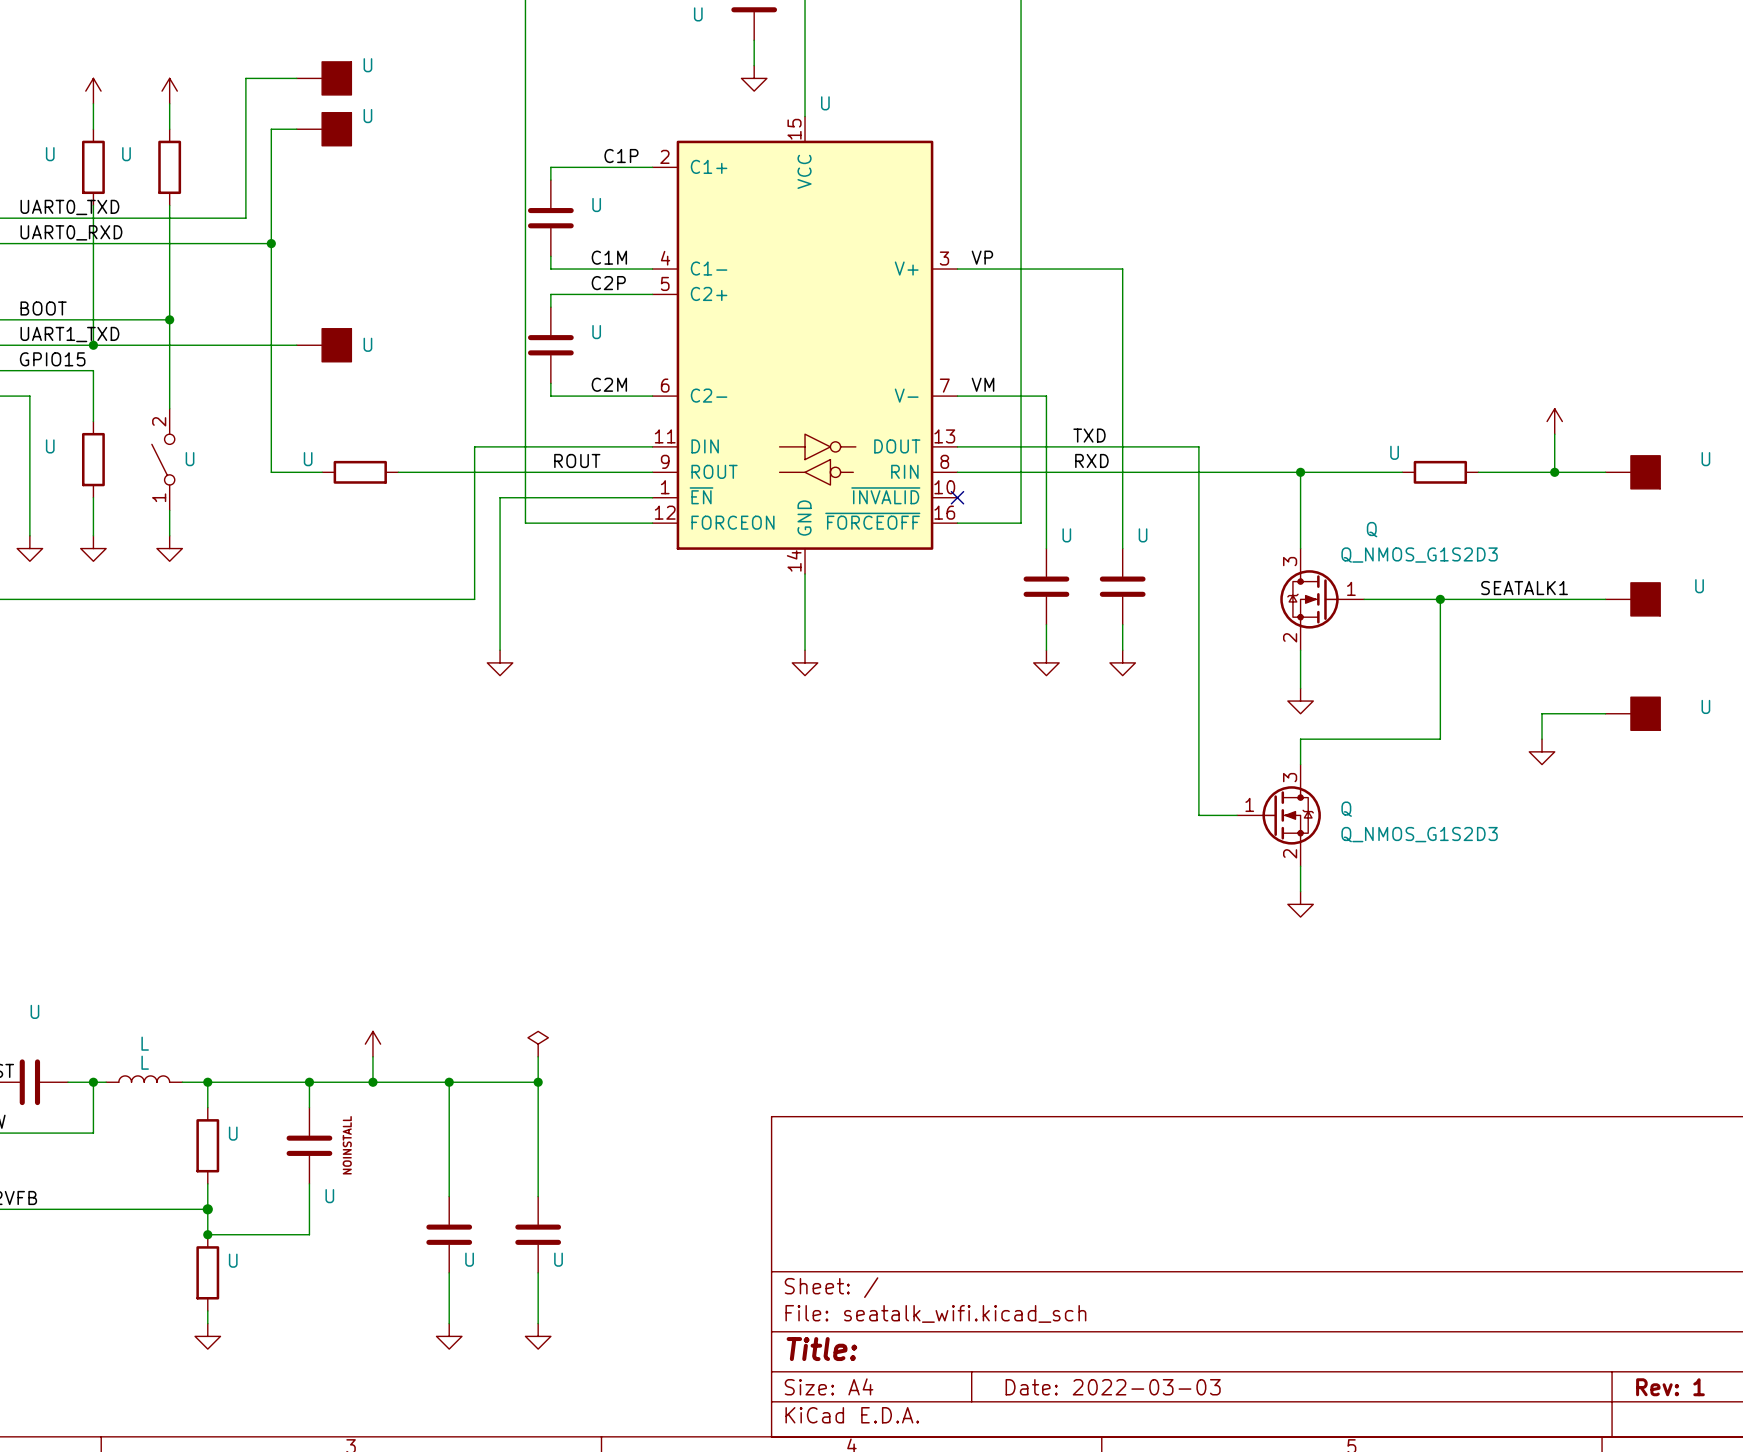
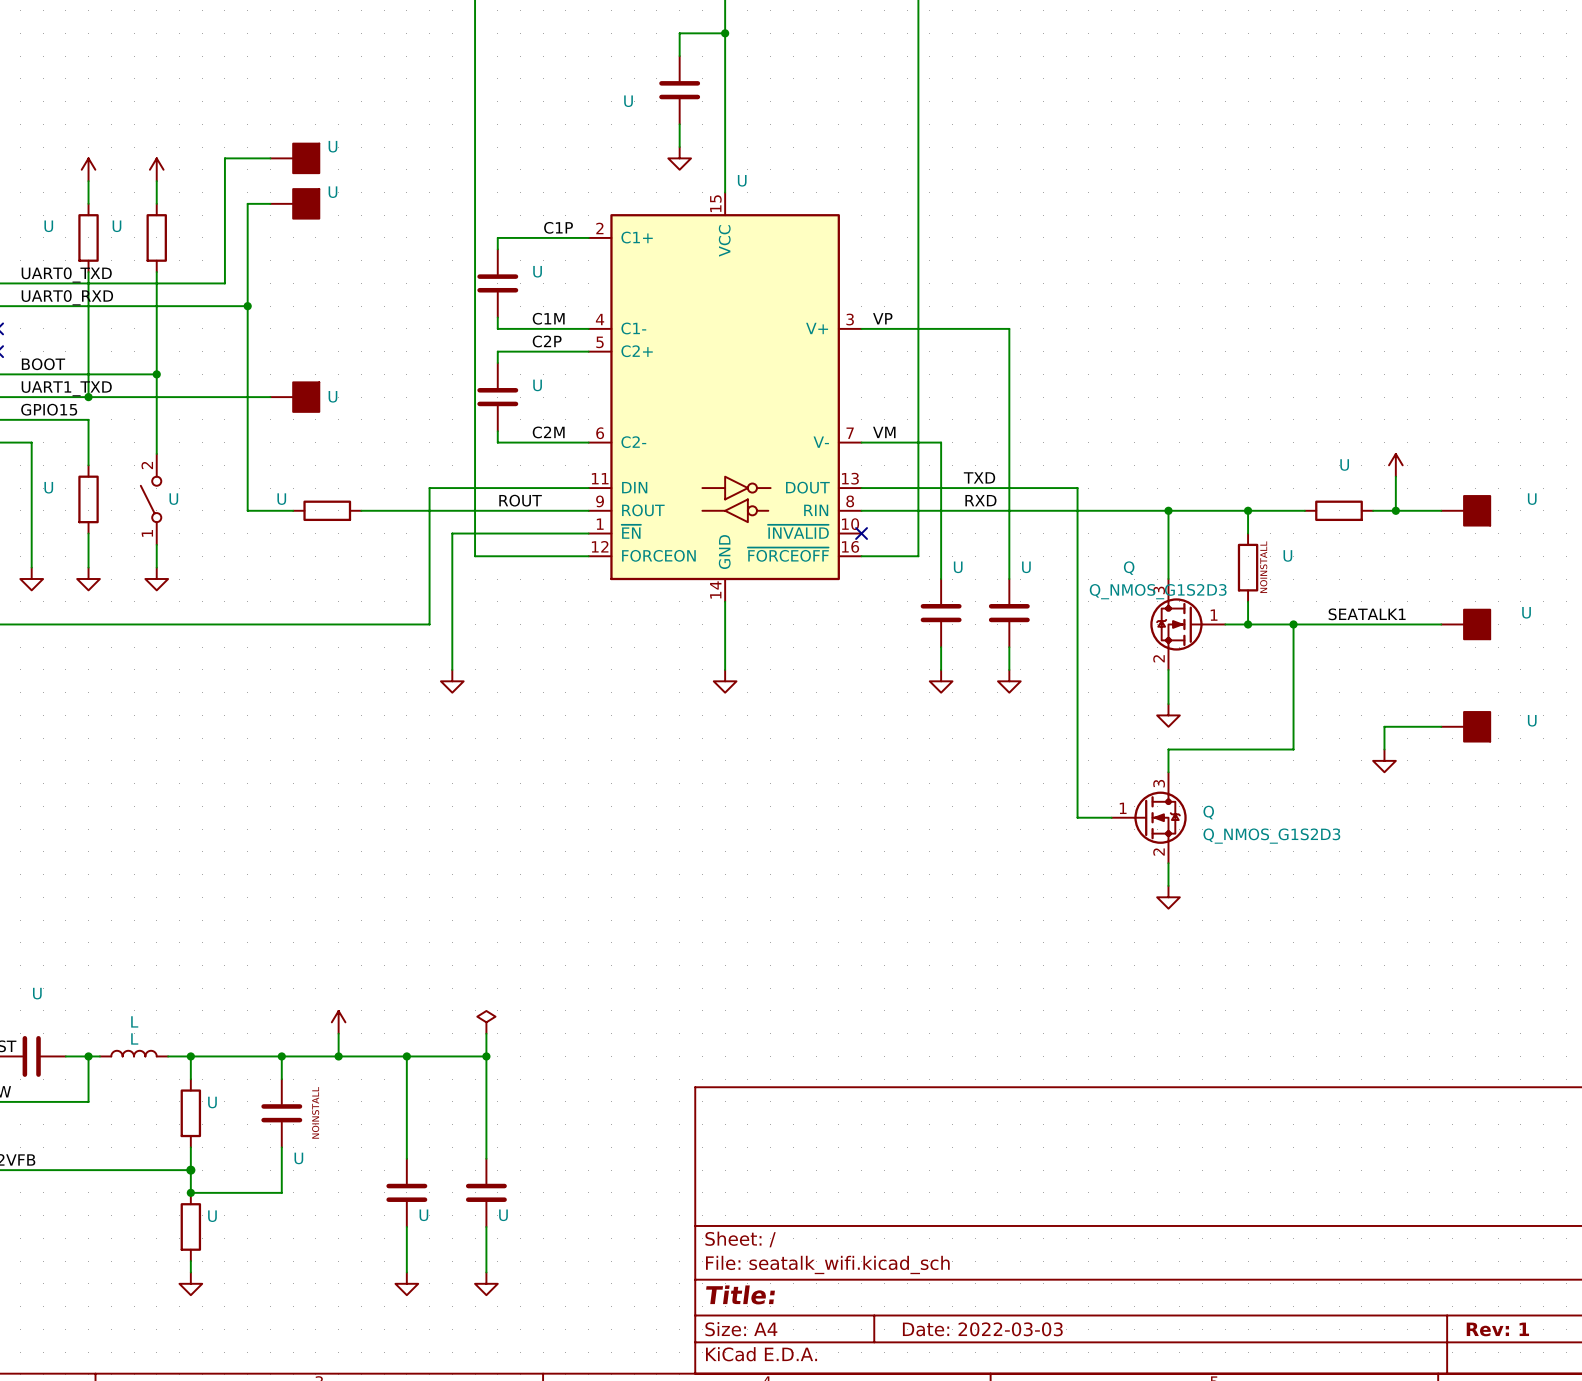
U name position: U (1394, 452) -> U (1344, 465)
wire: none -> (1248, 510) (1248, 533)
junction: none -> (1248, 510)
U position: (1440, 472) -> (1339, 510)
wire: (1478, 472) (1529, 472) -> (1259, 510) (1304, 510)
Q name position: Q (1372, 529) -> Q (1129, 568)
U: none -> (1248, 567)
Q value position: Q_NMOS_G1S2D3 (1419, 555) -> Q_NMOS_G1S2D3 (1158, 591)
wire: none -> (1248, 601) (1248, 624)
junction: none -> (1248, 624)

